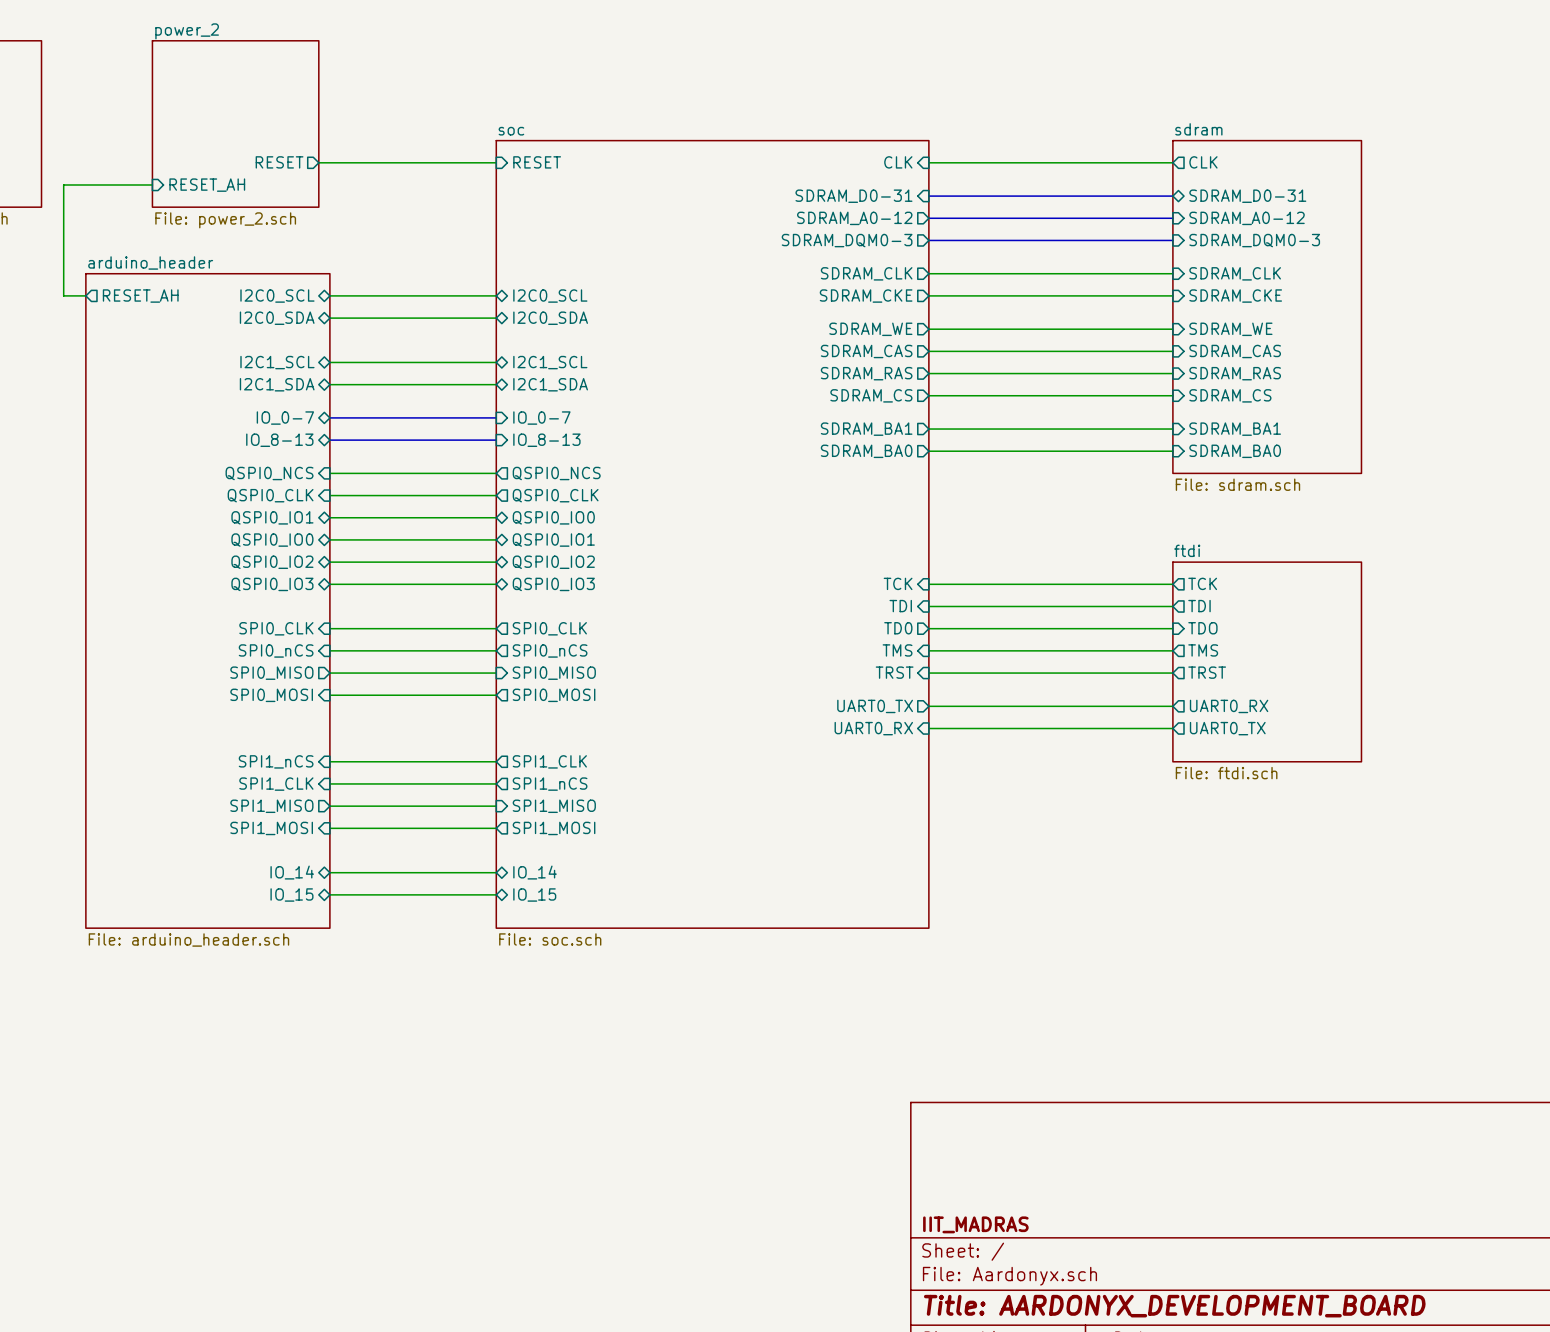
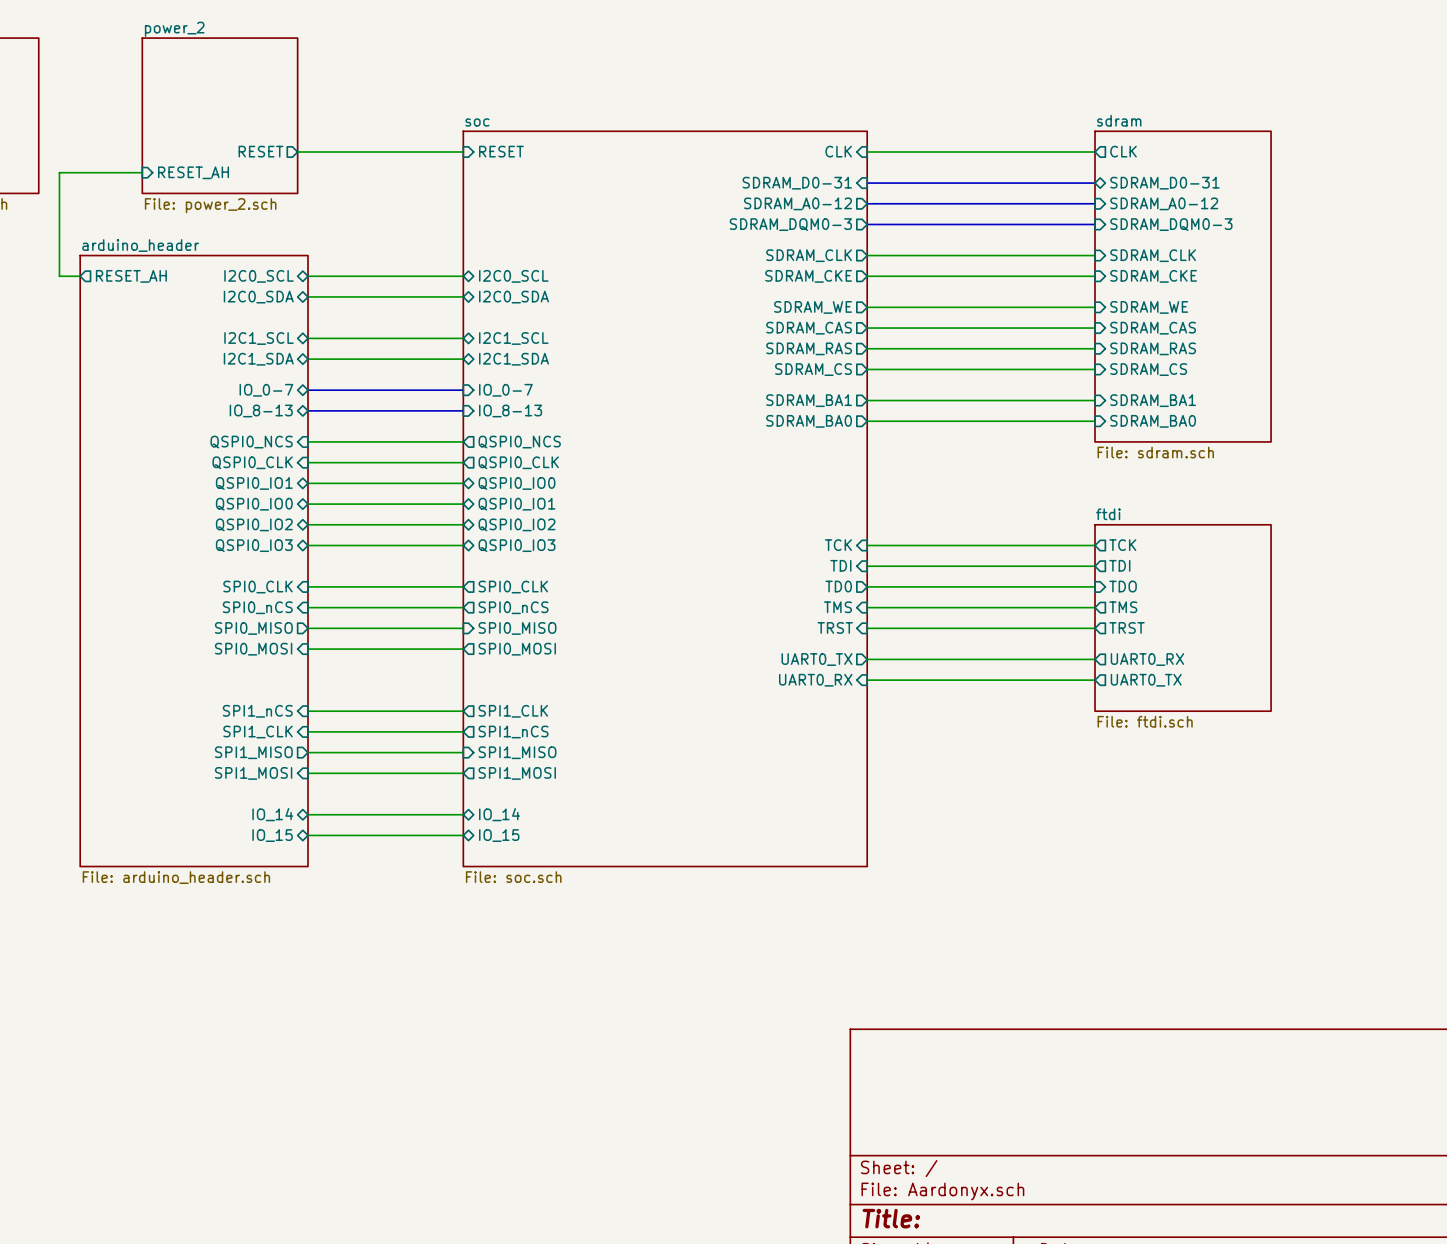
title block: IIT_MADRAS (975, 1224) -> none
title block: Title: AARDONYX_DEVELOPMENT_BOARD (1174, 1306) -> Title: (891, 1218)

